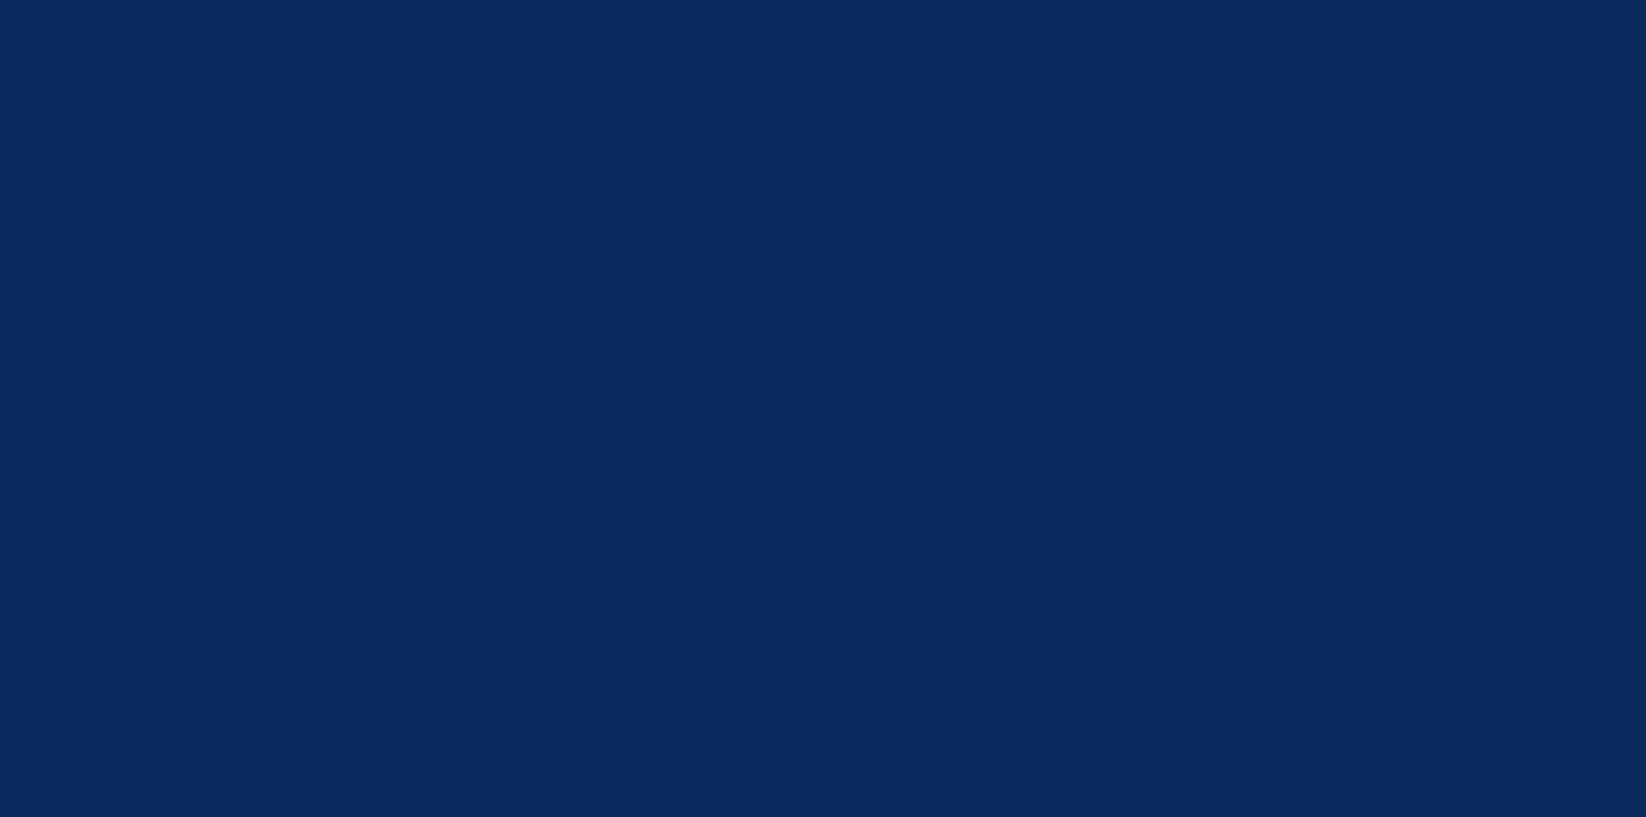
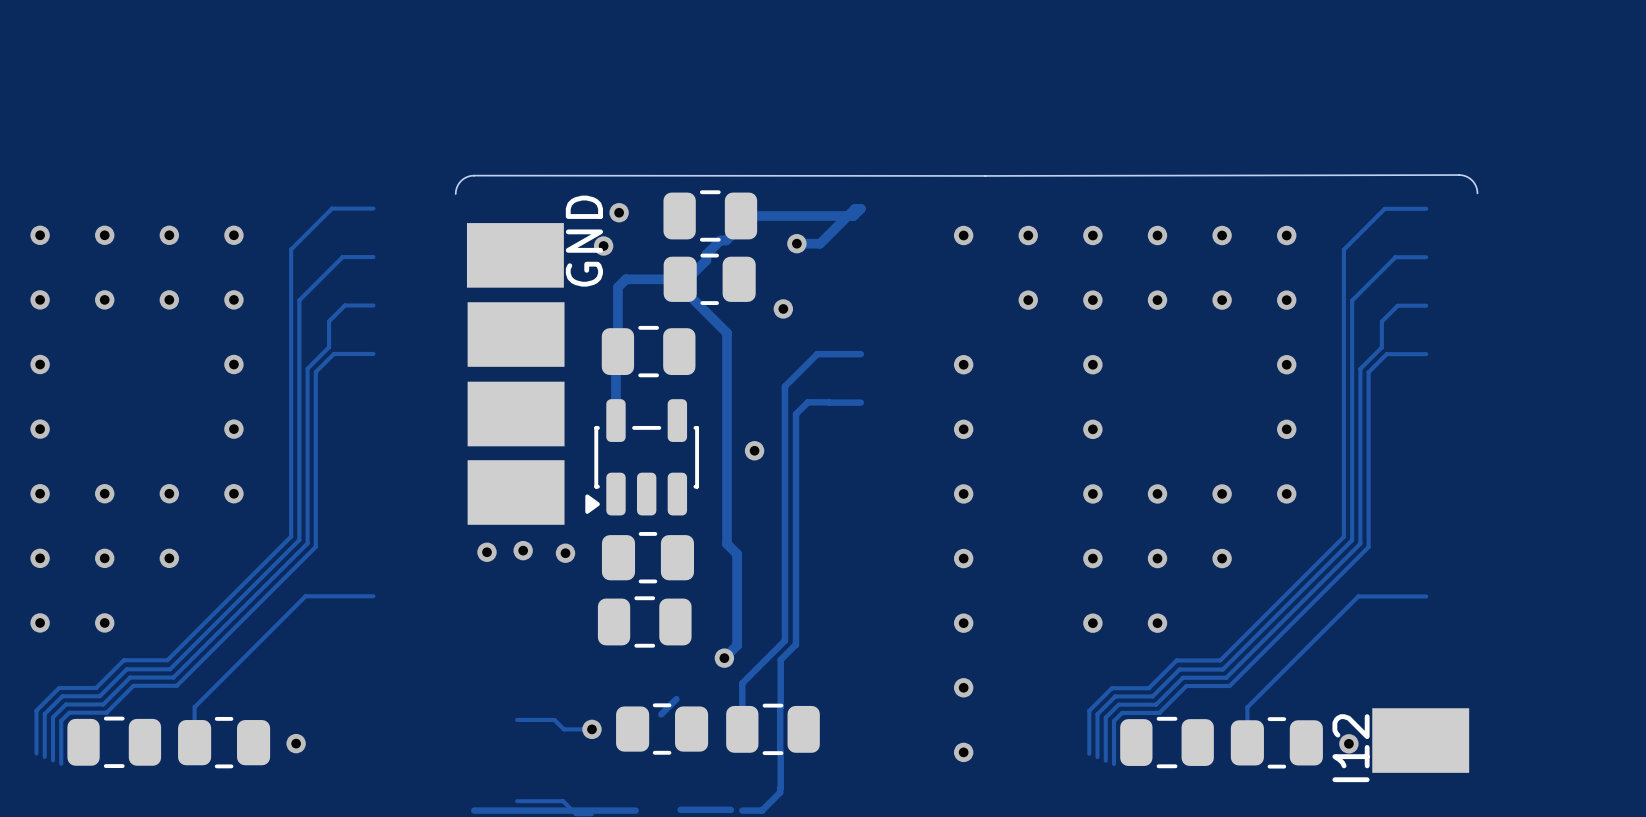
board edge: none -> (1477, 193) (1472, 180) (1459, 175) (474, 175) (461, 181) (455, 193)
track: none -> (373, 208) (332, 208) (291, 249) (291, 536) (167, 660) (123, 660) (96, 688) (59, 688) (36, 710) (36, 753)
track: none -> (1426, 208) (1384, 208) (1343, 249) (1343, 536) (1220, 660) (1176, 660) (1148, 688) (1111, 688) (1089, 710) (1089, 753)
via: none -> (619, 212)
part: none -> (710, 215)
via: none -> (40, 235)
via: none -> (104, 235)
via: none -> (169, 235)
via: none -> (233, 235)
via: none -> (963, 235)
via: none -> (1028, 235)
via: none -> (1092, 235)
via: none -> (1157, 235)
via: none -> (1222, 235)
via: none -> (1286, 235)
text: none -> GND (584, 241)
track: none -> (796, 243) (820, 243) (855, 208) (860, 208) (853, 215) (741, 215) (741, 224) (726, 240) (720, 240) (706, 254) (706, 260) (687, 279) (626, 279) (617, 287) (615, 420)
via: none -> (796, 243)
via: none -> (603, 246)
part: none -> (515, 255)
track: none -> (373, 257) (342, 257) (299, 300) (299, 540) (170, 669) (126, 669) (99, 696) (62, 696) (44, 714) (44, 756)
track: none -> (1426, 257) (1395, 257) (1352, 300) (1352, 540) (1222, 669) (1179, 669) (1152, 696) (1115, 696) (1097, 714) (1097, 757)
track: none -> (680, 279) (680, 286) (727, 333) (727, 543) (737, 554) (737, 645) (724, 658)
part: none -> (709, 279)
via: none -> (40, 299)
via: none -> (104, 299)
via: none -> (169, 299)
via: none -> (233, 299)
via: none -> (1028, 300)
via: none -> (1092, 300)
via: none -> (1157, 300)
via: none -> (1222, 300)
via: none -> (1286, 300)
track: none -> (373, 305) (344, 305) (329, 321) (329, 347) (307, 368) (307, 543) (173, 677) (130, 677) (103, 704) (65, 704) (52, 717) (52, 760)
track: none -> (1426, 305) (1397, 305) (1381, 321) (1381, 347) (1360, 368) (1360, 543) (1226, 677) (1182, 677) (1156, 704) (1118, 704) (1105, 717) (1105, 760)
via: none -> (783, 308)
part: none -> (516, 334)
part: none -> (648, 351)
track: none -> (373, 353) (333, 353) (315, 372) (315, 546) (176, 685) (133, 685) (106, 712) (69, 712) (61, 720) (61, 763)
track: none -> (860, 354) (817, 354) (784, 386) (784, 640) (742, 683) (742, 729)
track: none -> (1426, 354) (1386, 354) (1368, 372) (1368, 547) (1229, 686) (1186, 686) (1159, 712) (1122, 712) (1114, 721) (1114, 764)
via: none -> (40, 364)
via: none -> (233, 364)
via: none -> (963, 364)
via: none -> (1092, 364)
via: none -> (1286, 364)
track: none -> (829, 402) (807, 402) (795, 414) (795, 644) (780, 659) (780, 792) (762, 810) (742, 810)
track: none -> (829, 402) (860, 402)
part: none -> (516, 413)
via: none -> (40, 429)
via: none -> (233, 429)
via: none -> (963, 429)
via: none -> (1092, 429)
via: none -> (1286, 429)
via: none -> (754, 450)
part: none -> (642, 457)
part: none -> (516, 492)
via: none -> (40, 493)
via: none -> (104, 493)
via: none -> (169, 493)
via: none -> (233, 493)
via: none -> (963, 493)
via: none -> (1092, 493)
via: none -> (1157, 493)
via: none -> (1222, 493)
via: none -> (1286, 493)
via: none -> (523, 550)
via: none -> (487, 552)
via: none -> (565, 553)
part: none -> (647, 557)
via: none -> (40, 558)
via: none -> (104, 558)
via: none -> (169, 558)
via: none -> (963, 558)
via: none -> (1092, 558)
via: none -> (1157, 558)
via: none -> (1222, 558)
track: none -> (373, 596) (305, 596) (194, 707) (194, 742)
track: none -> (1426, 596) (1358, 596) (1247, 707) (1247, 742)
part: none -> (644, 621)
via: none -> (40, 622)
via: none -> (104, 622)
via: none -> (963, 623)
via: none -> (1092, 623)
via: none -> (1157, 623)
via: none -> (724, 658)
via: none -> (963, 687)
track: none -> (676, 699) (661, 714)
track: none -> (517, 719) (554, 719) (563, 729) (591, 729)
via: none -> (591, 729)
part: none -> (662, 729)
part: none -> (772, 729)
I12: none -> (1420, 740)
part: none -> (114, 742)
part: none -> (224, 742)
part: none -> (1167, 742)
part: none -> (1276, 742)
via: none -> (296, 743)
via: none -> (1348, 743)
via: none -> (963, 752)
track: none -> (517, 801) (563, 801) (576, 814) (591, 814)
track: none -> (680, 809) (730, 809)
track: none -> (474, 810) (635, 810)

